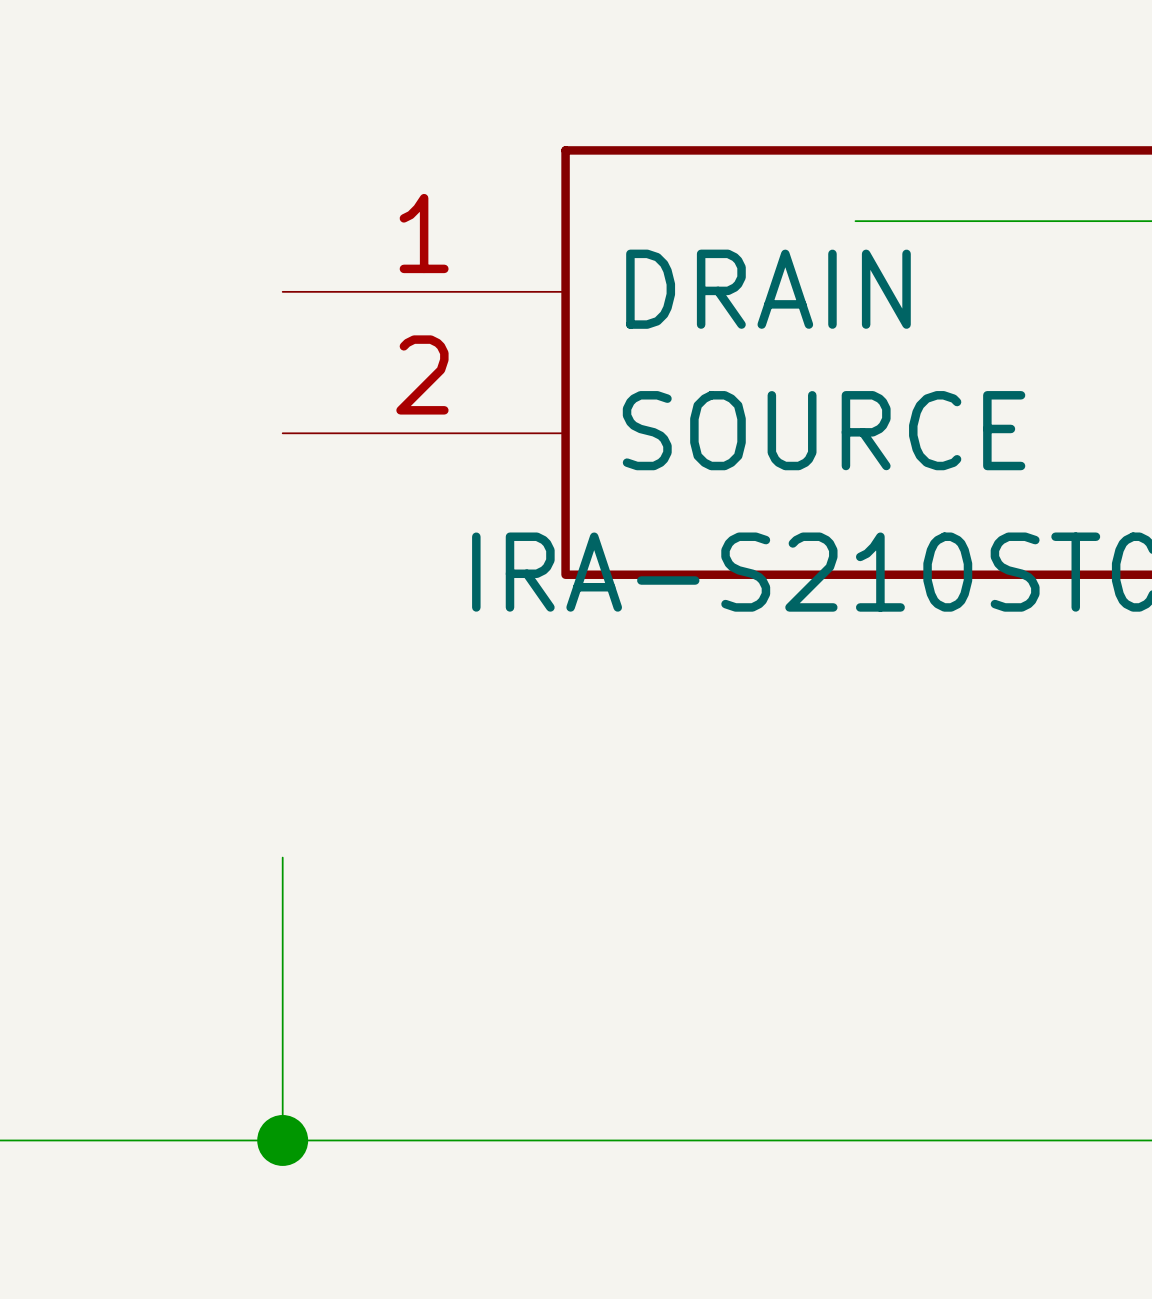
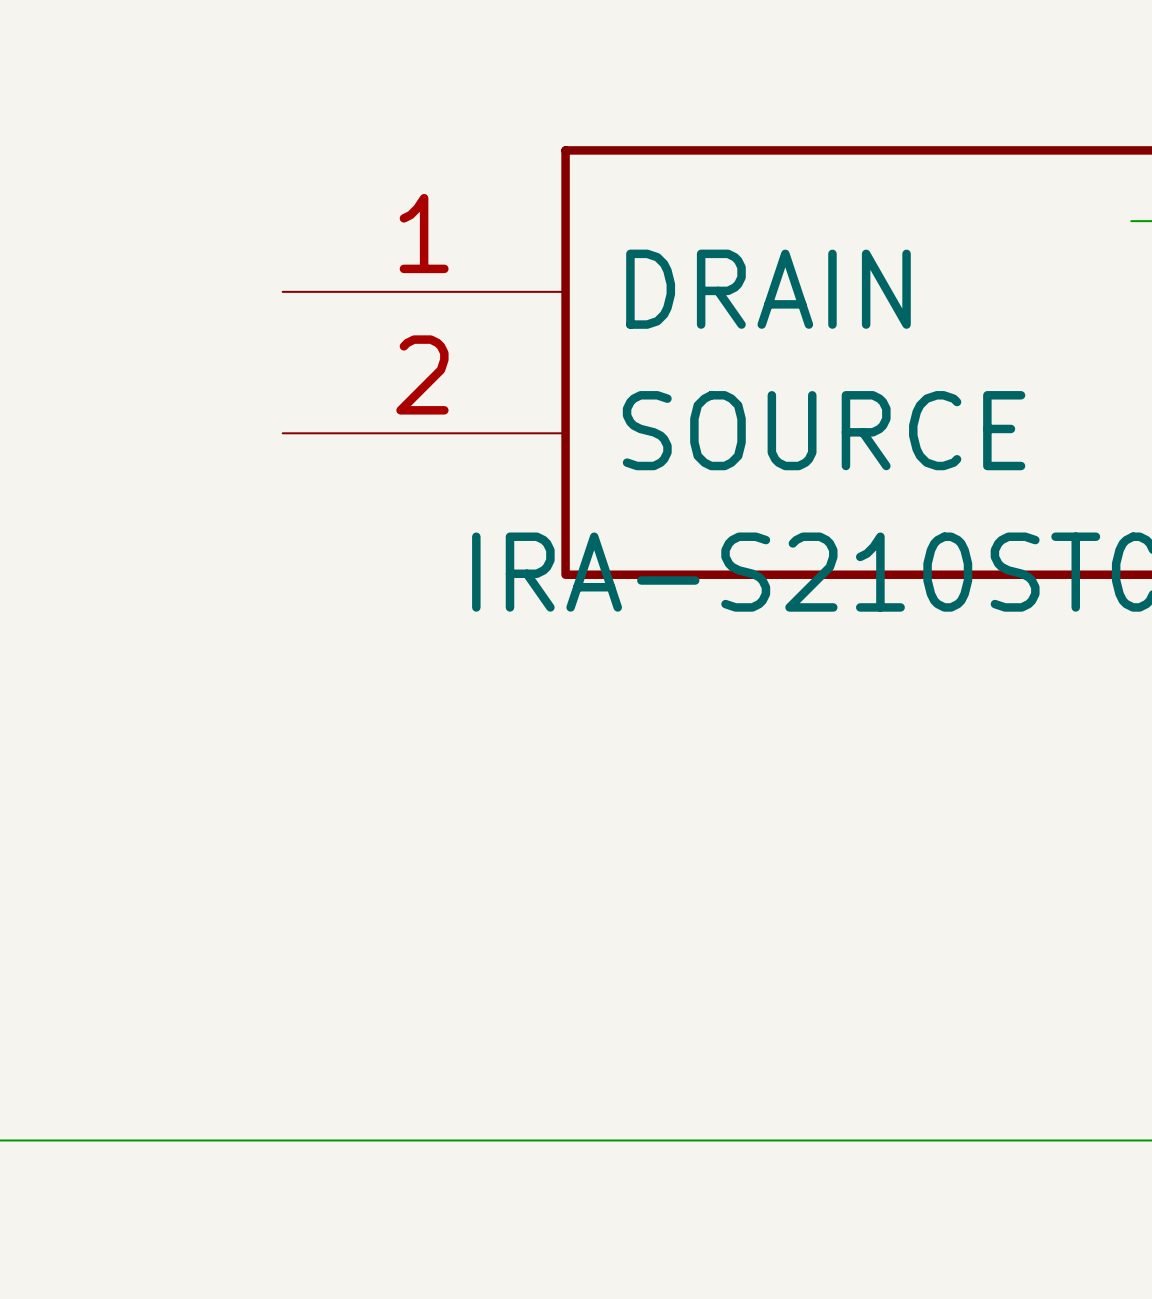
wire: (855, 221) (1131, 221) -> none
wire: (282, 857) (282, 1140) -> none
junction: (282, 1140) -> none

